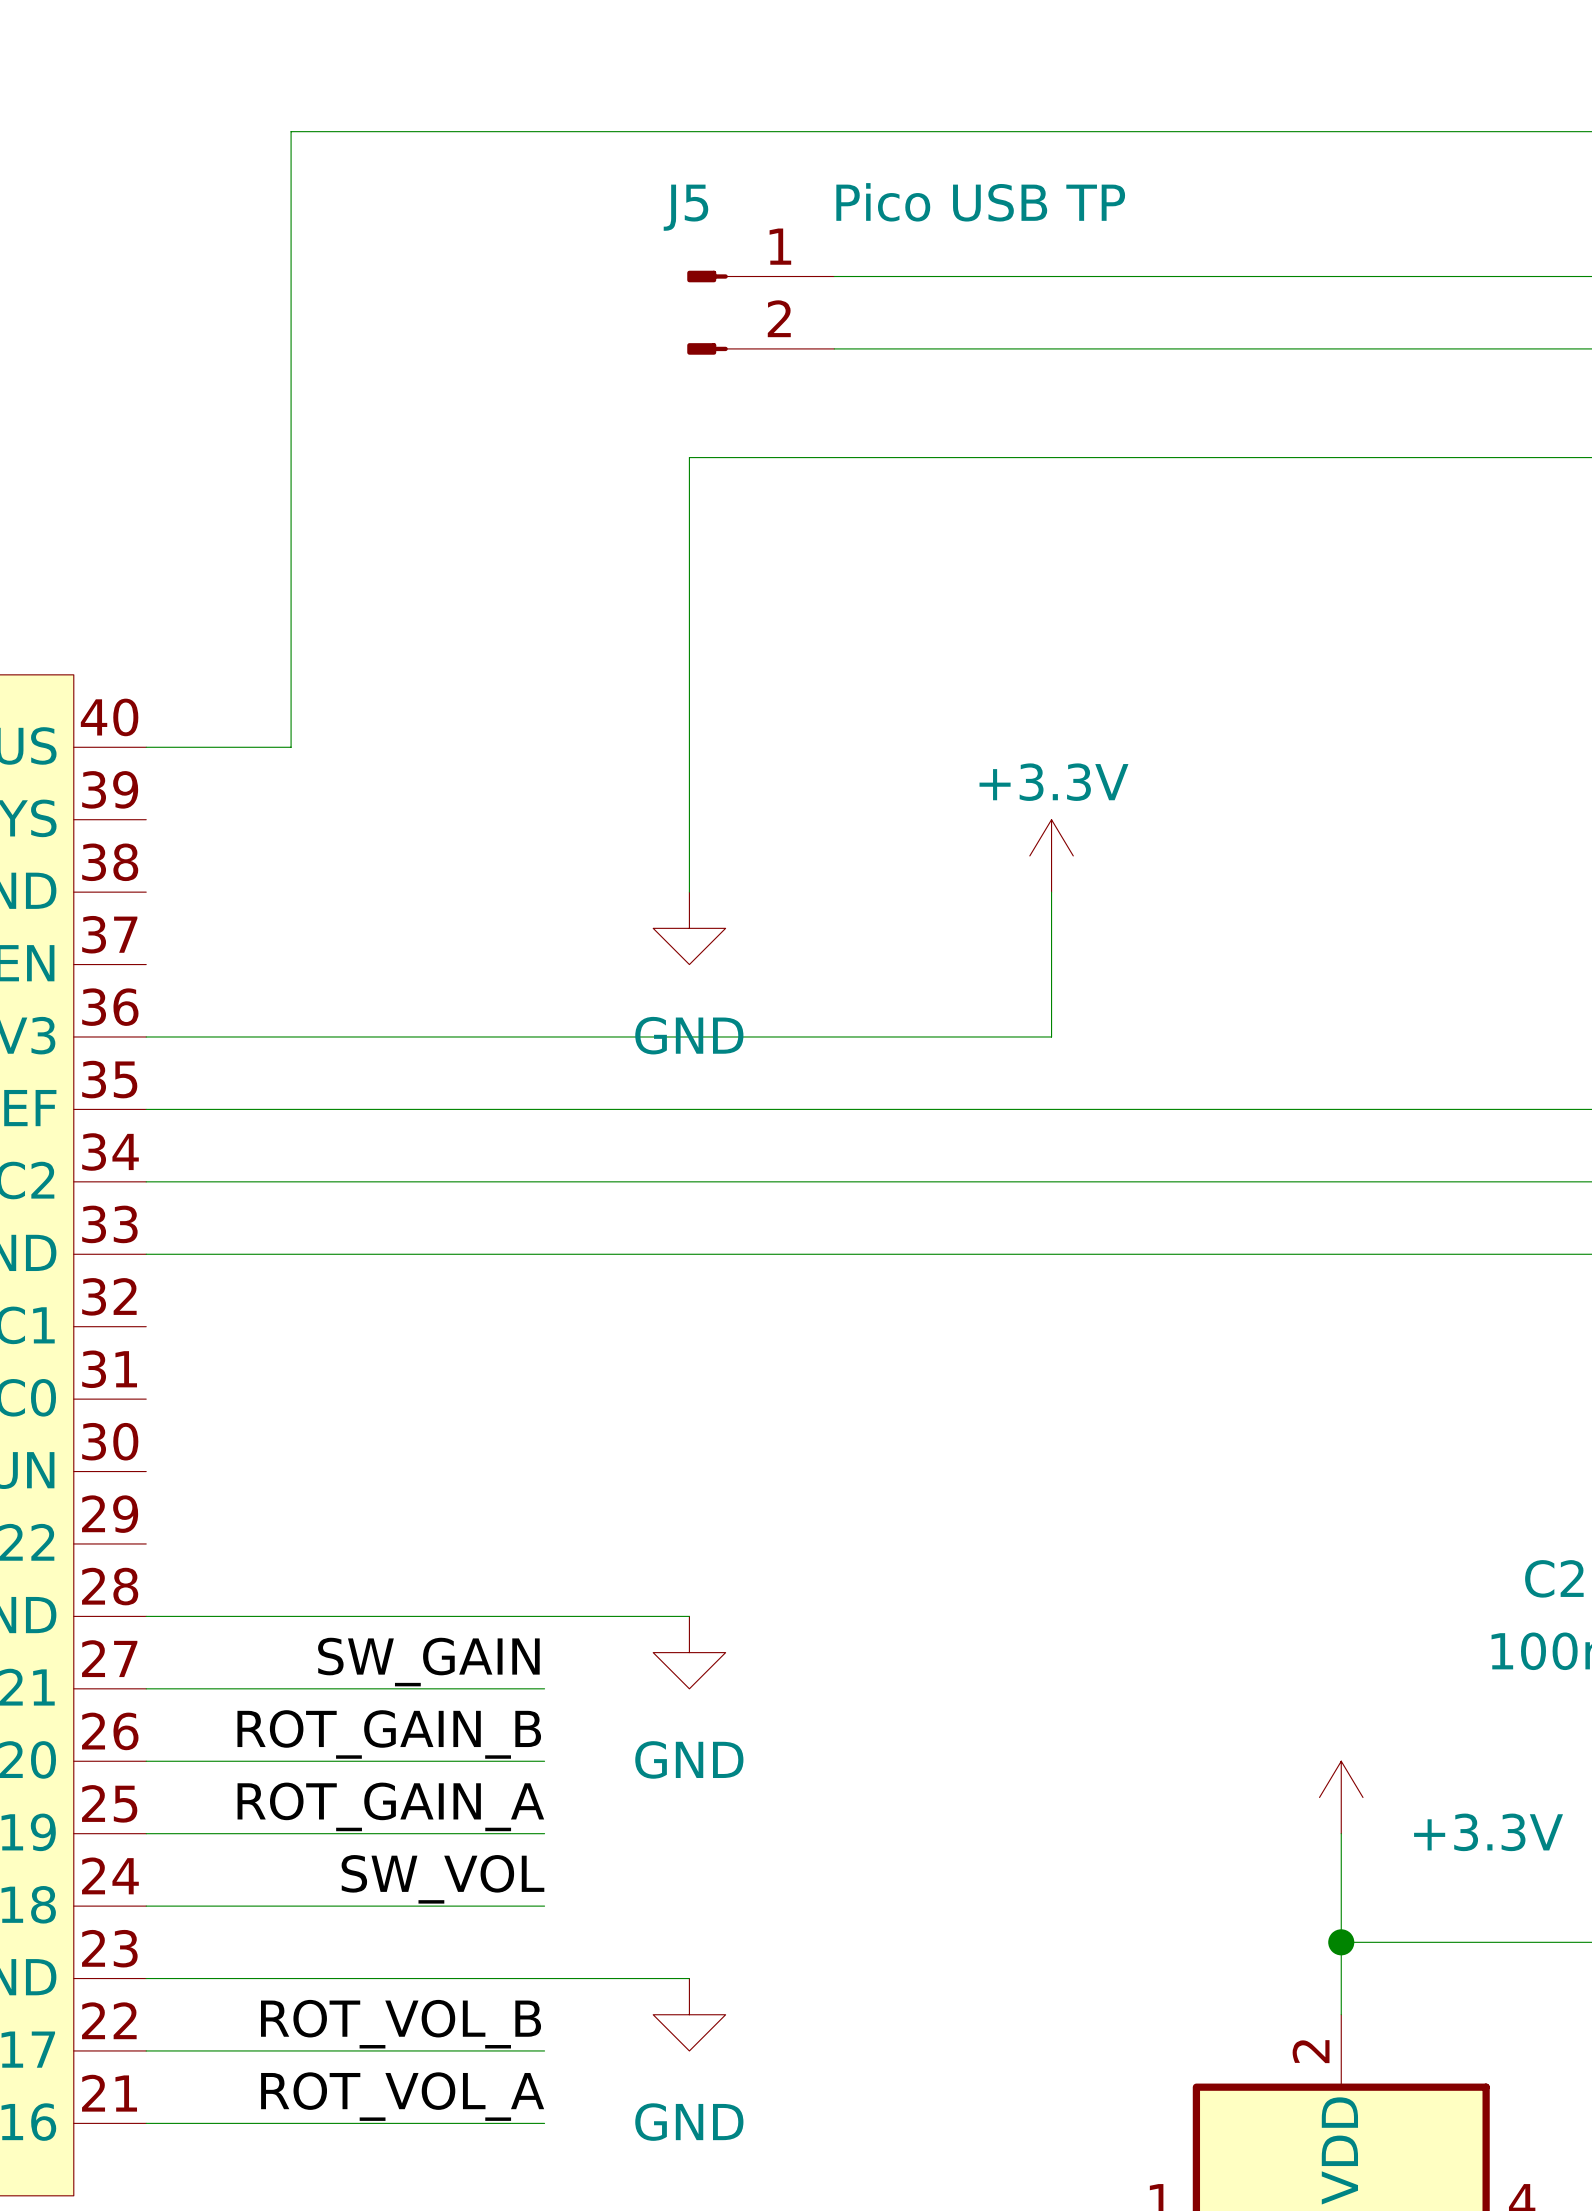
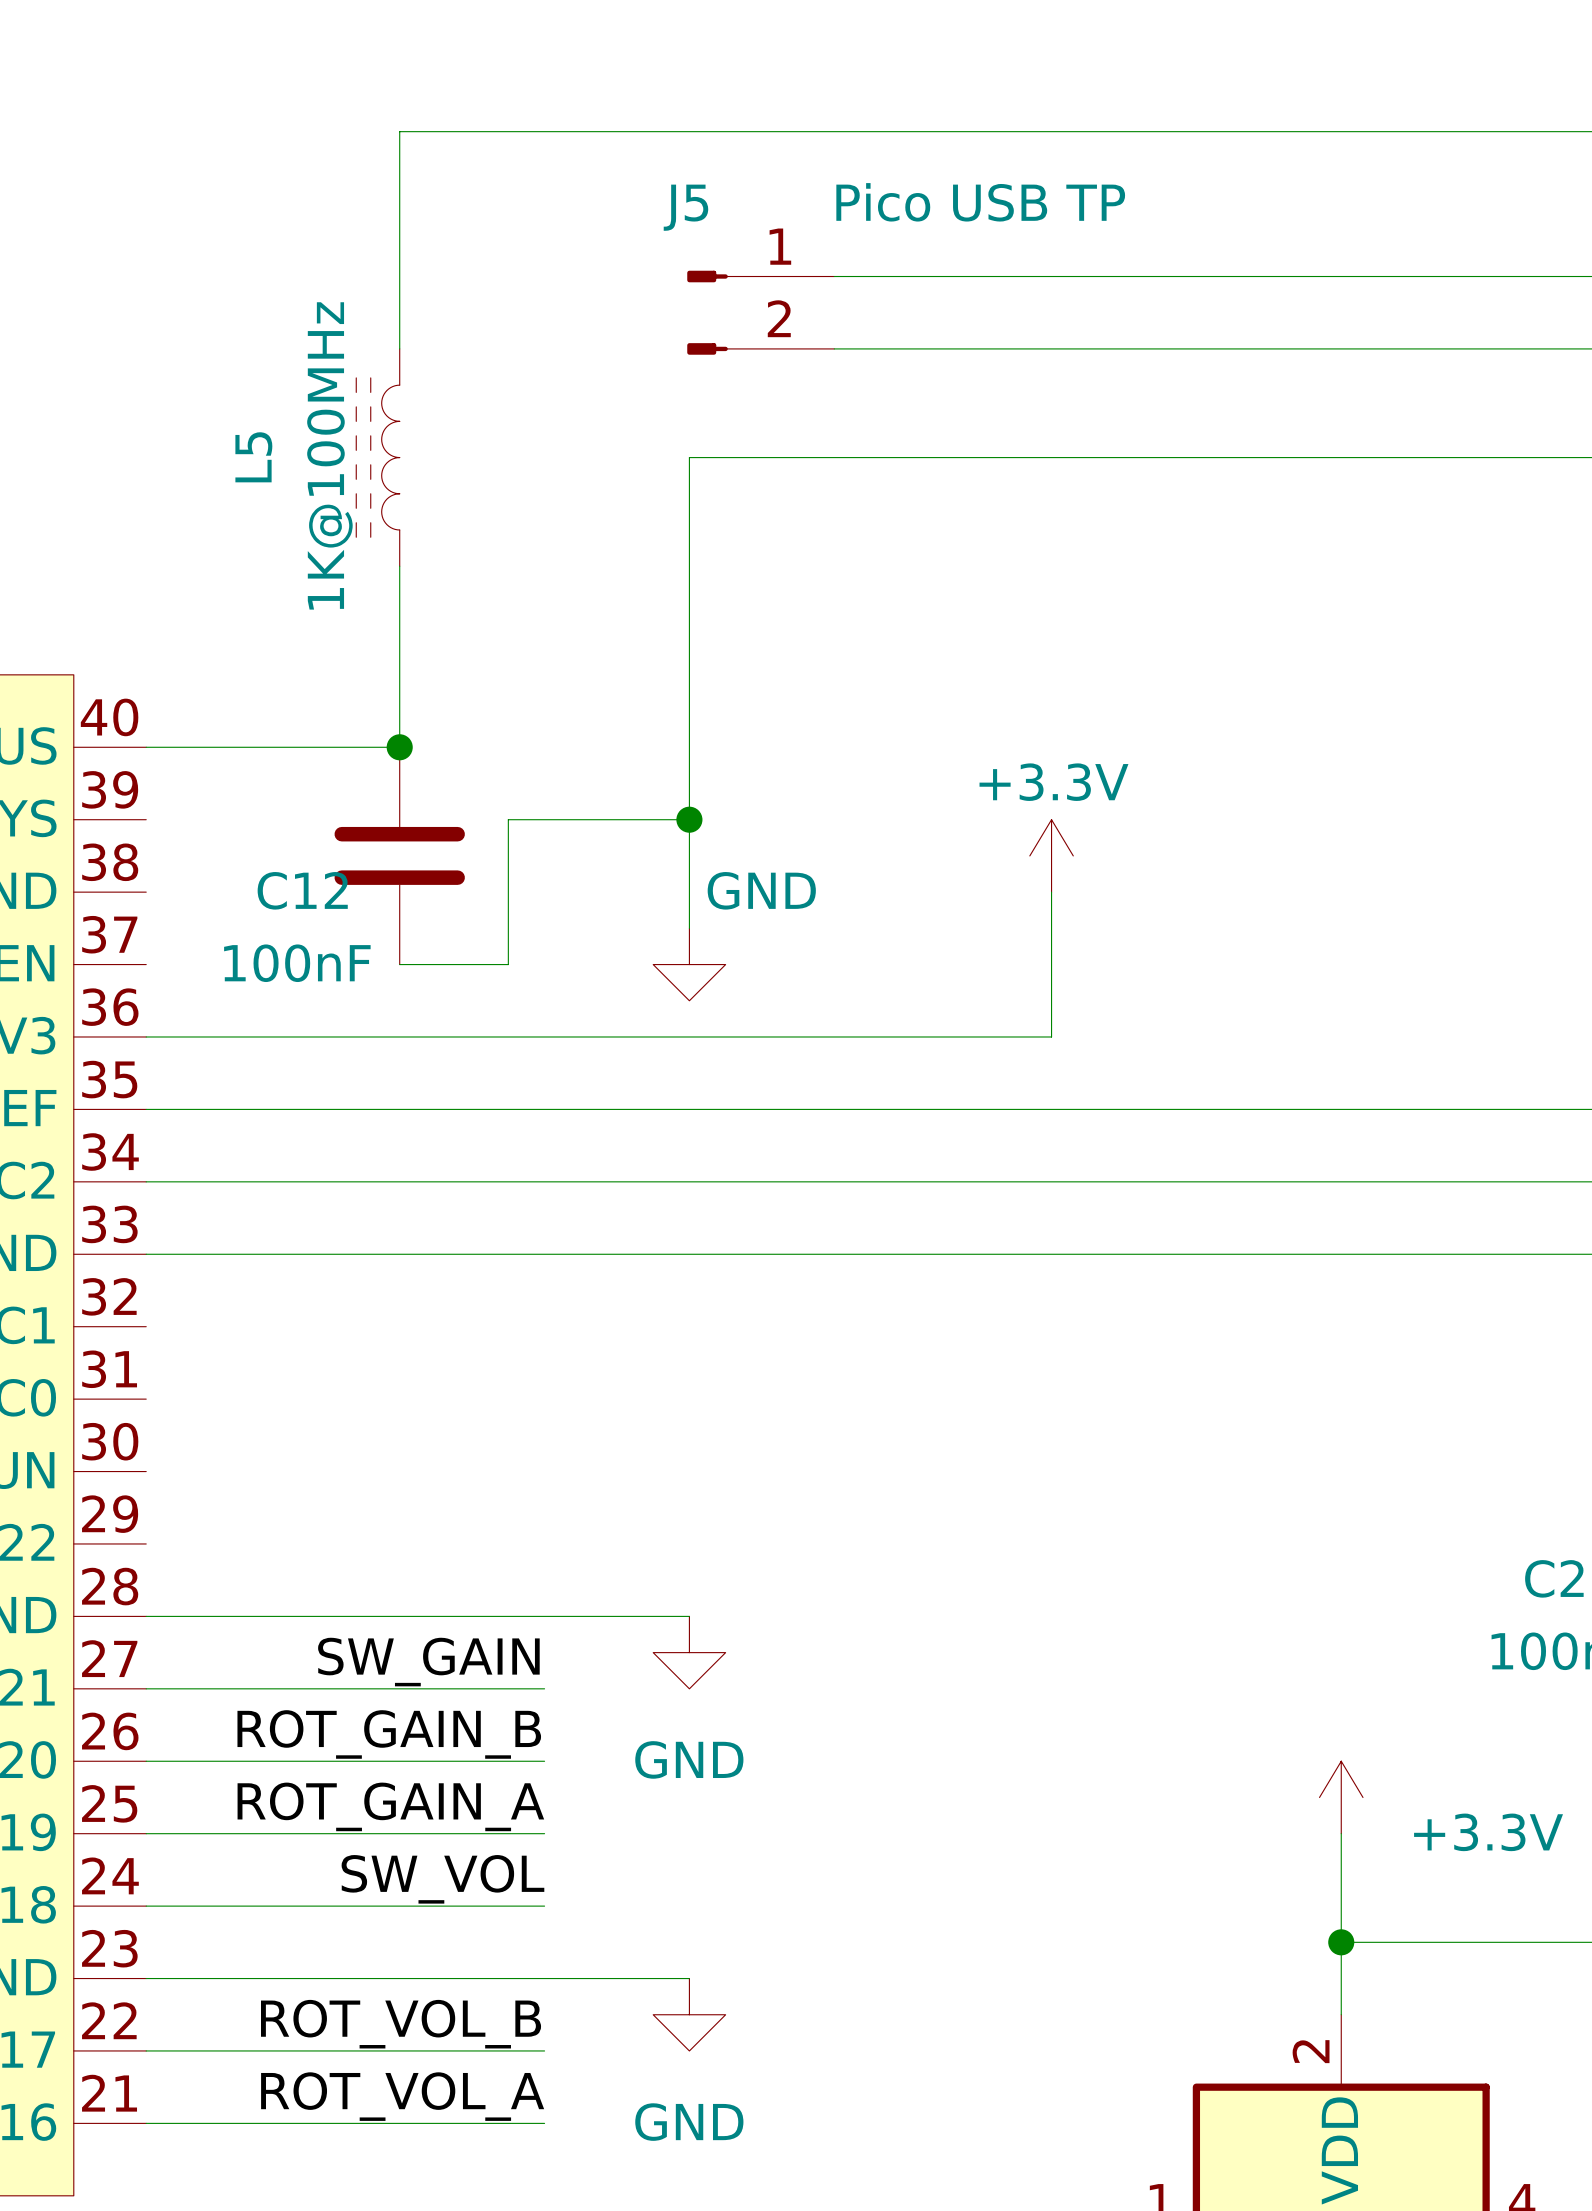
wire: (399, 131) (291, 131) (291, 747) -> (399, 131) (399, 348)
L5: none -> 1K@100MHz (377, 457)
wire: none -> (399, 566) (399, 747) (291, 747)
junction: none -> (399, 747)
wire: none -> (689, 819) (508, 819) (508, 964) (399, 964)
junction: none -> (689, 819)
C12: none -> 100nF (399, 855)
power symbol position: GND (689, 928) -> GND (689, 964)
power symbol text position: GND (689, 1035) -> GND (761, 890)

